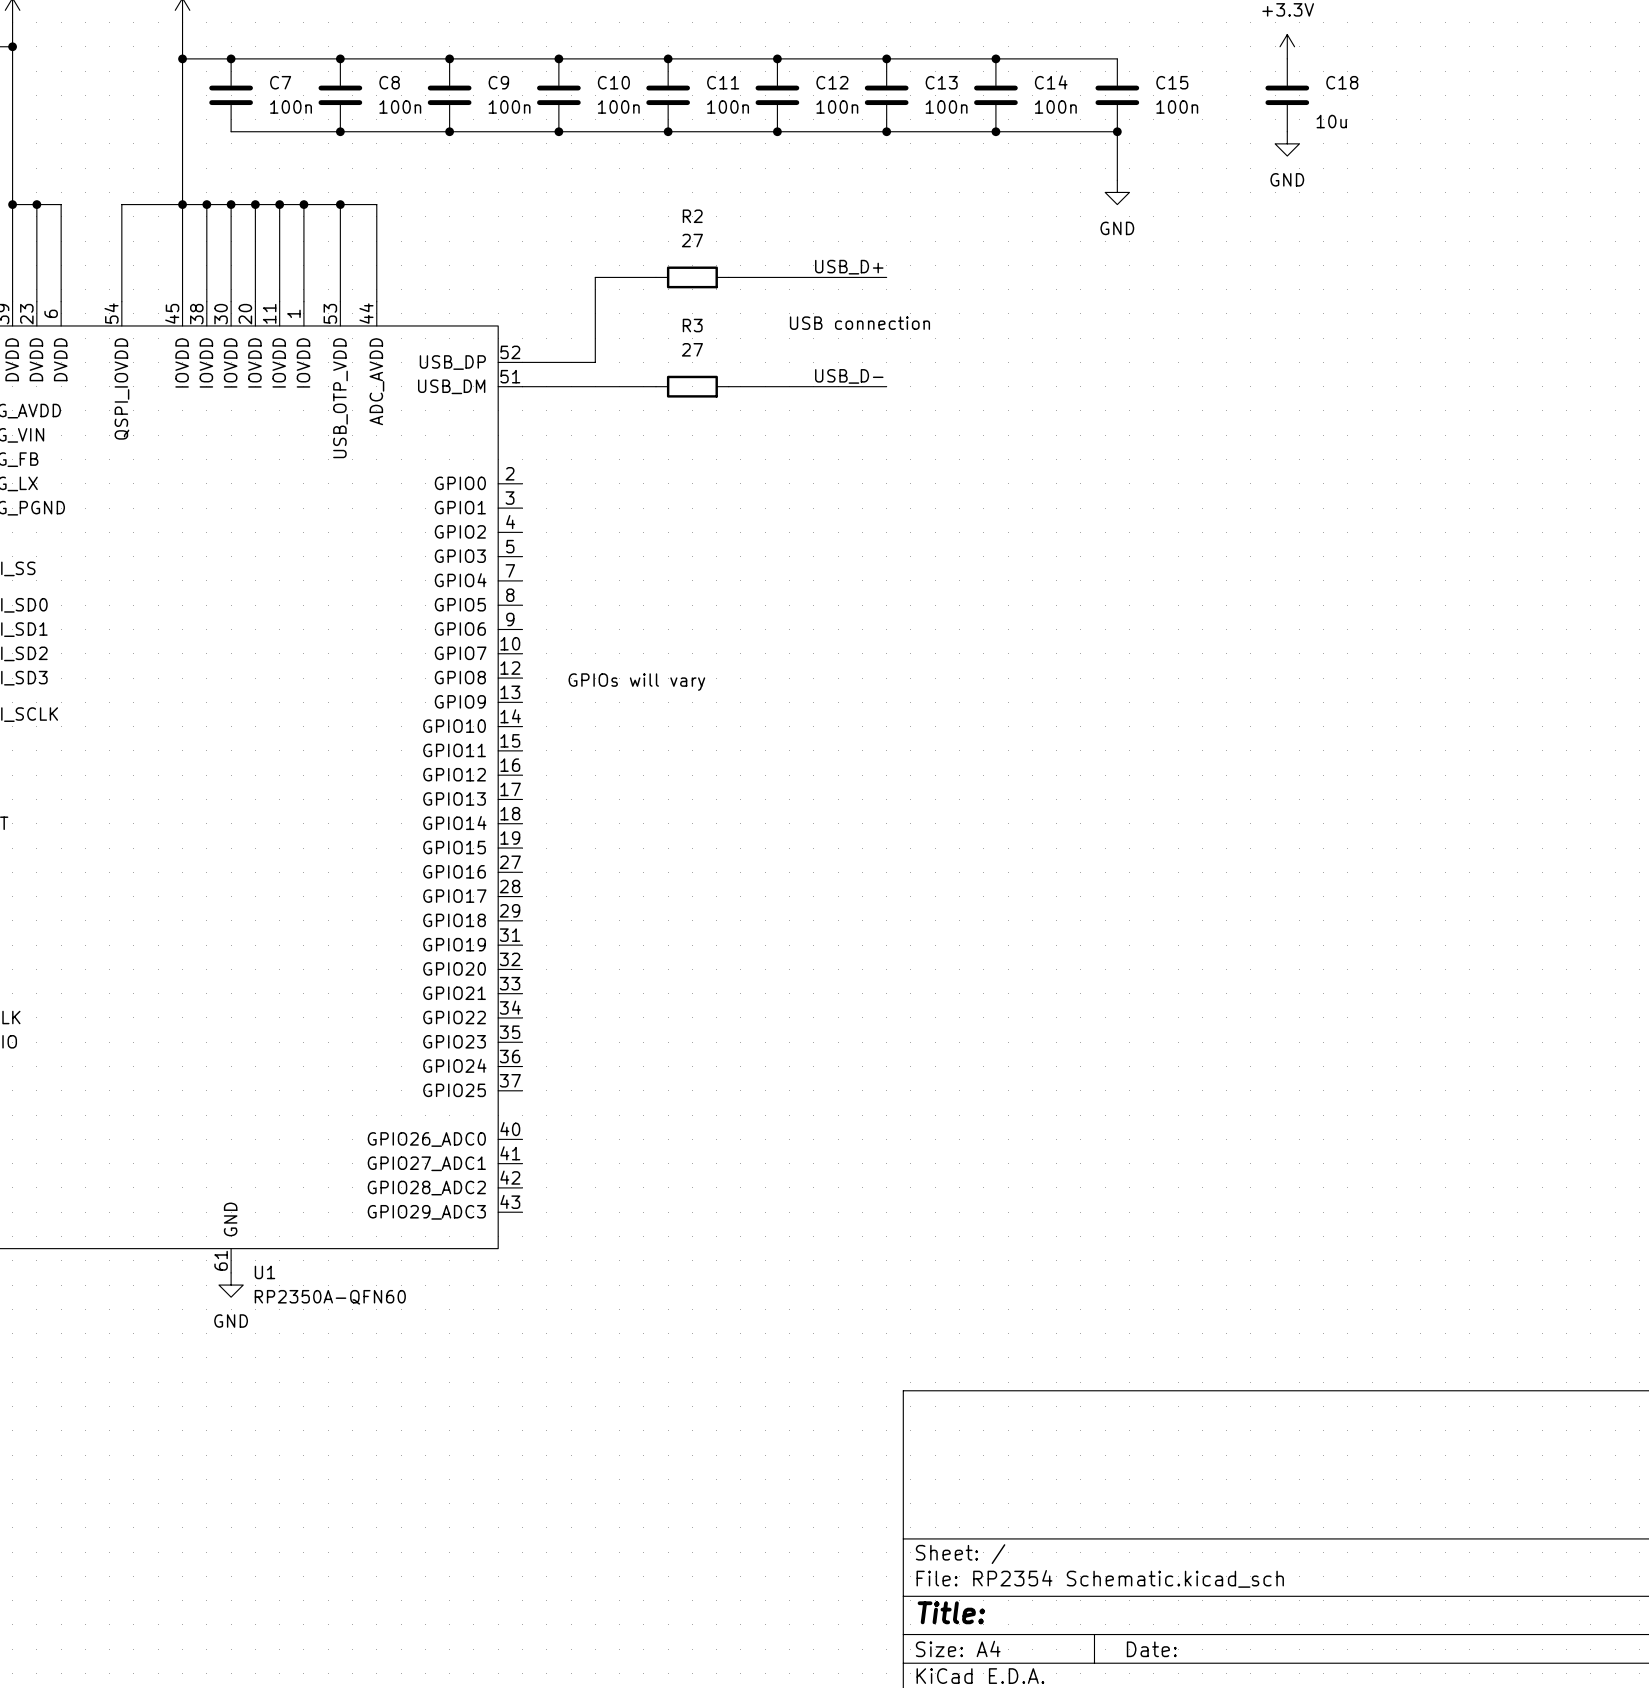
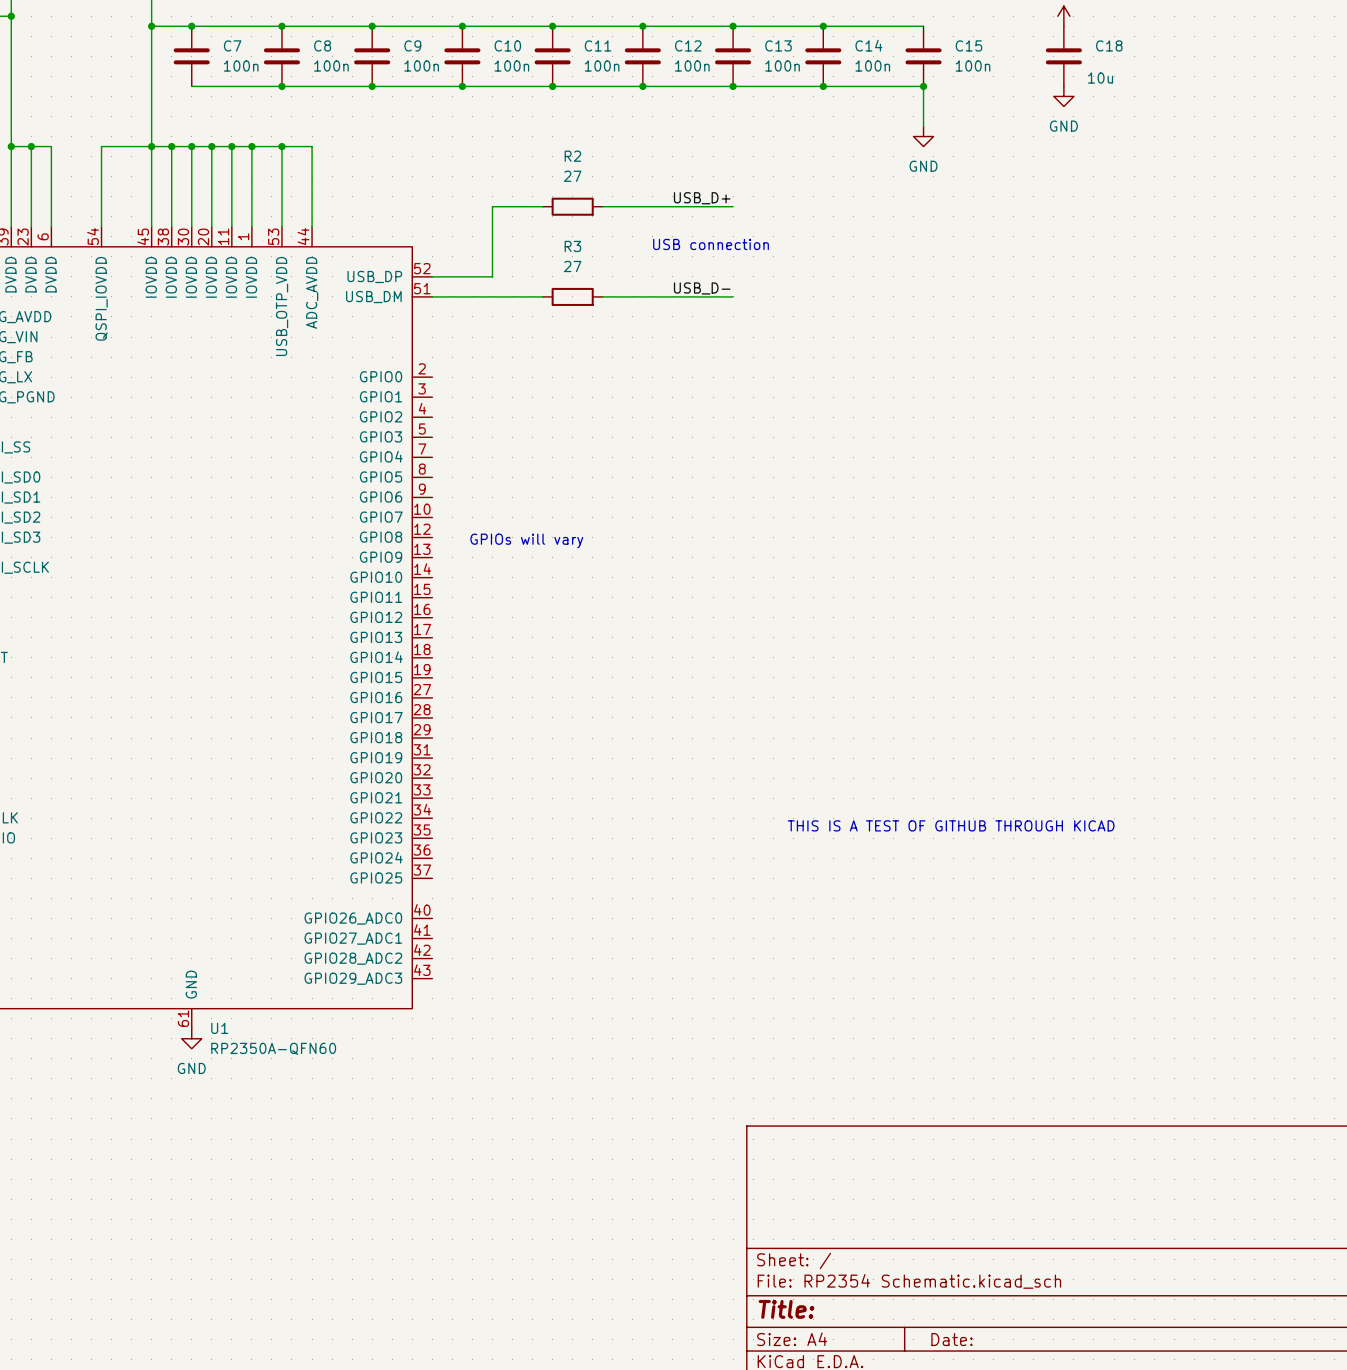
text: none -> THIS IS A TEST OF GITHUB THROUGH KICAD (951, 825)

